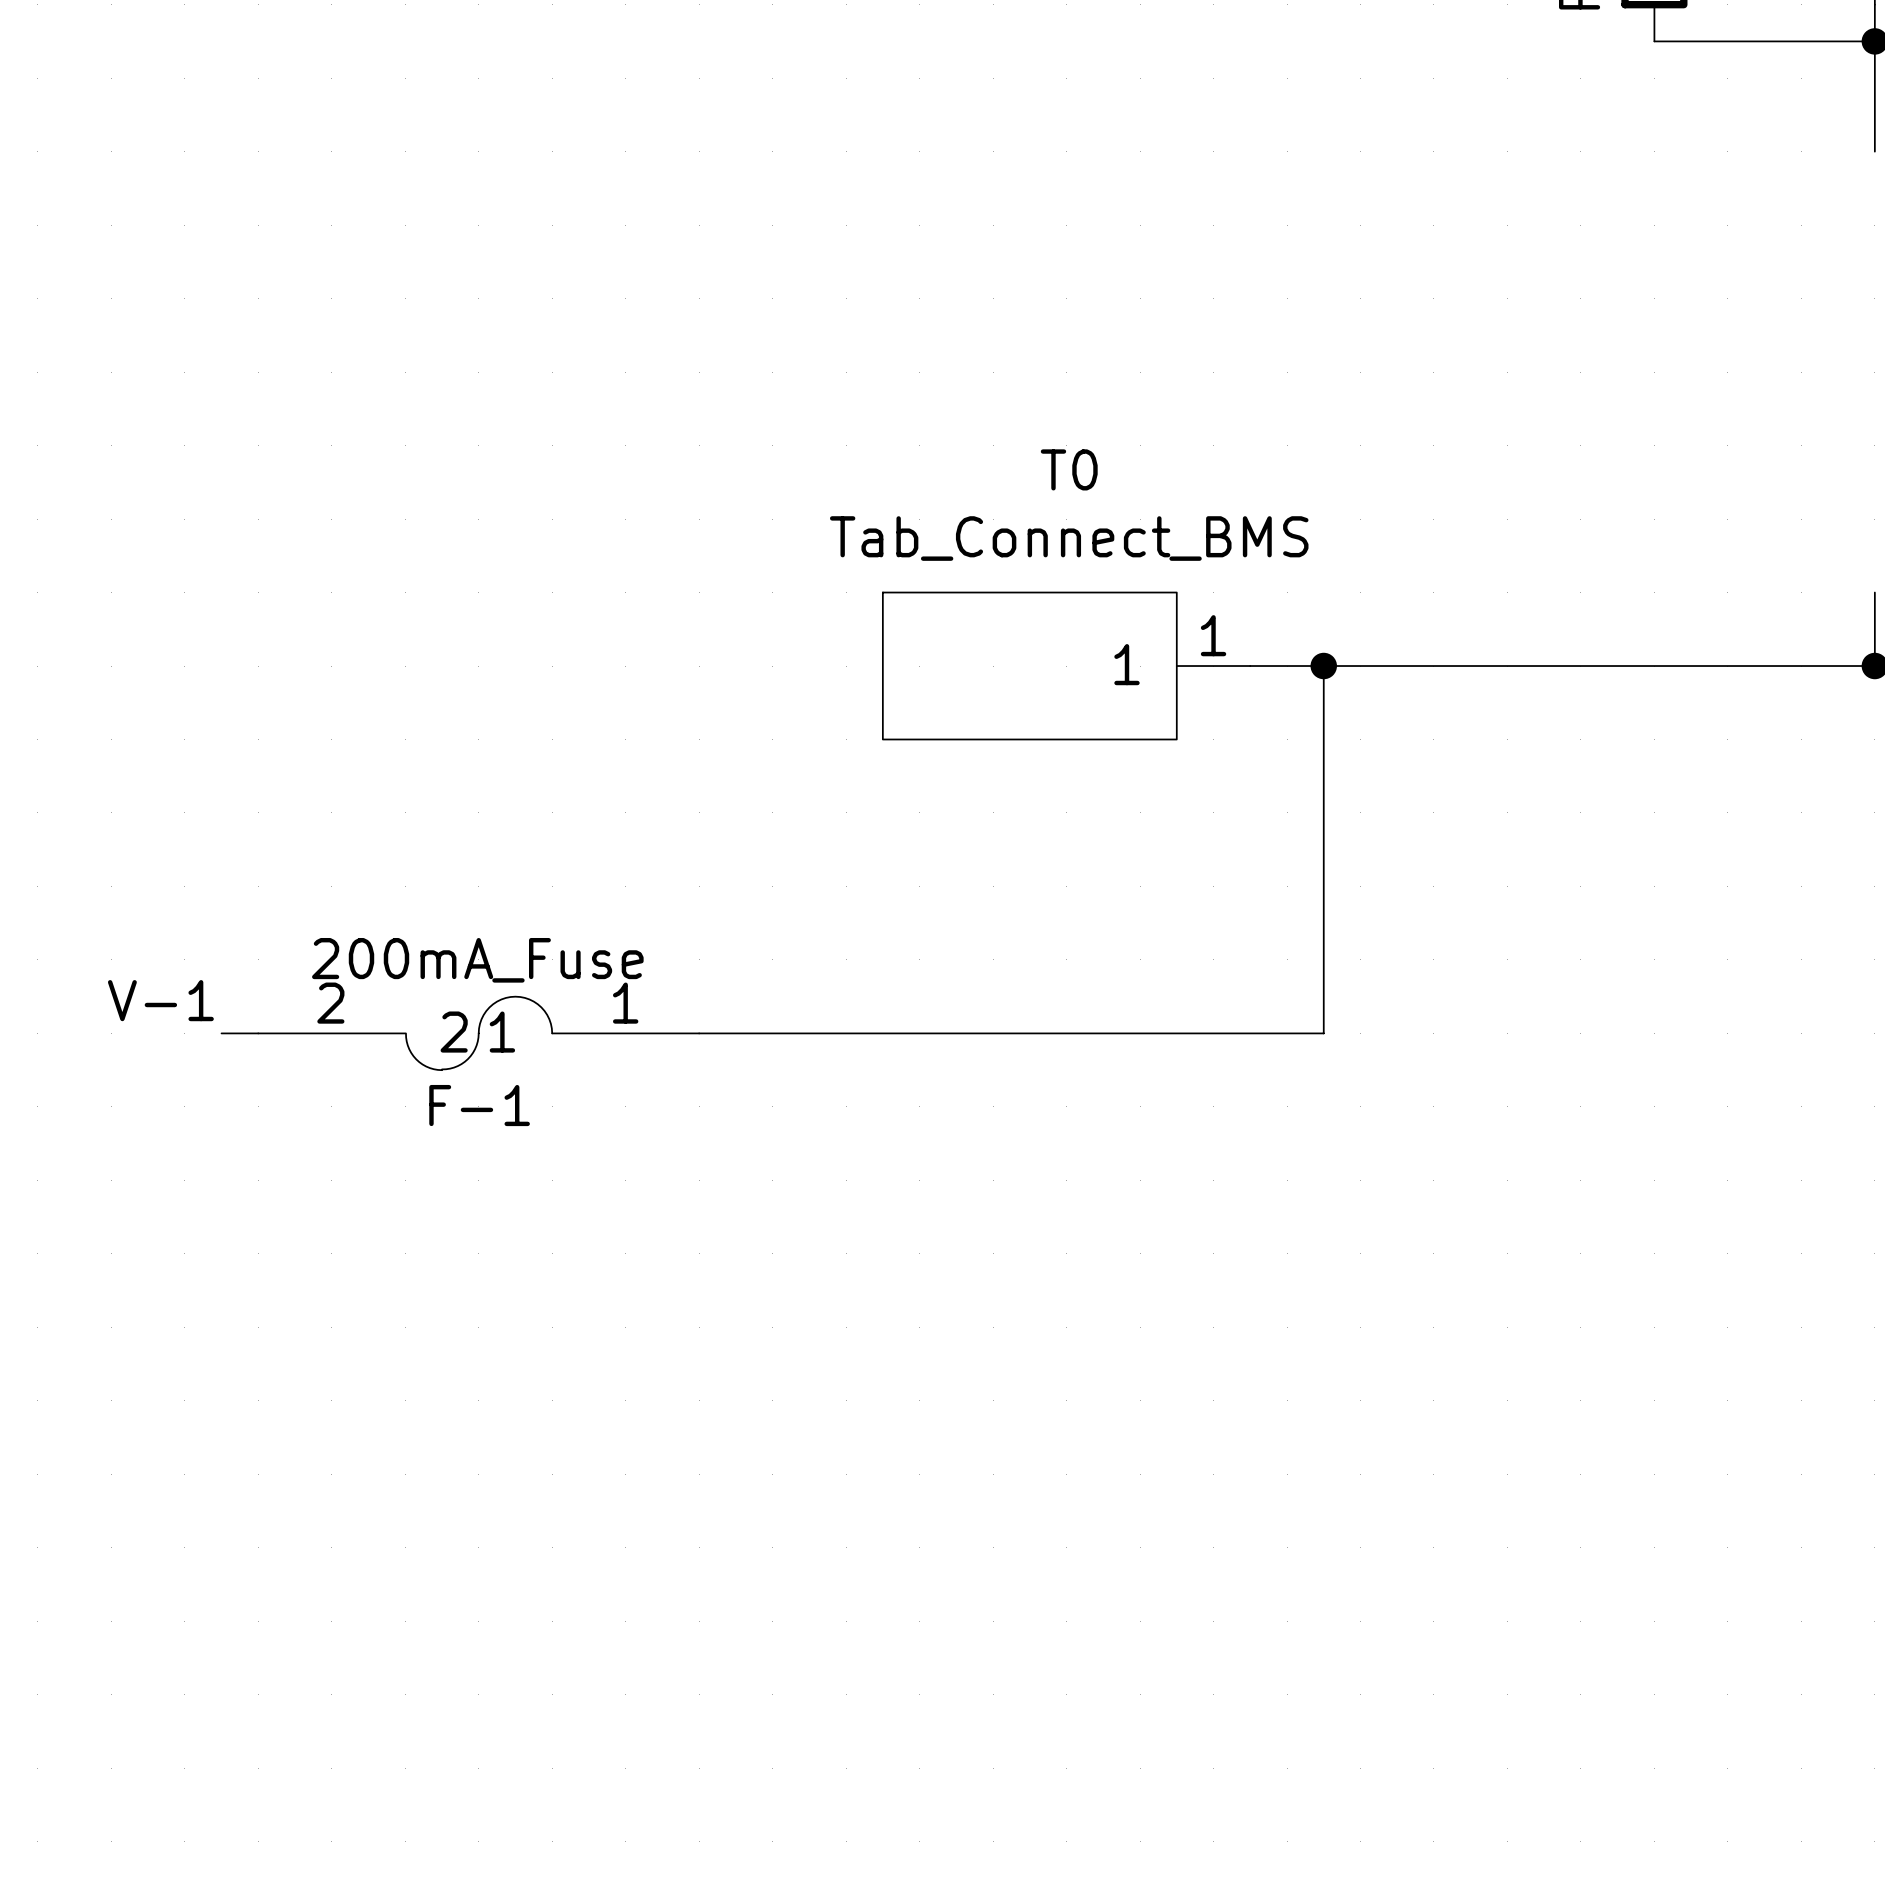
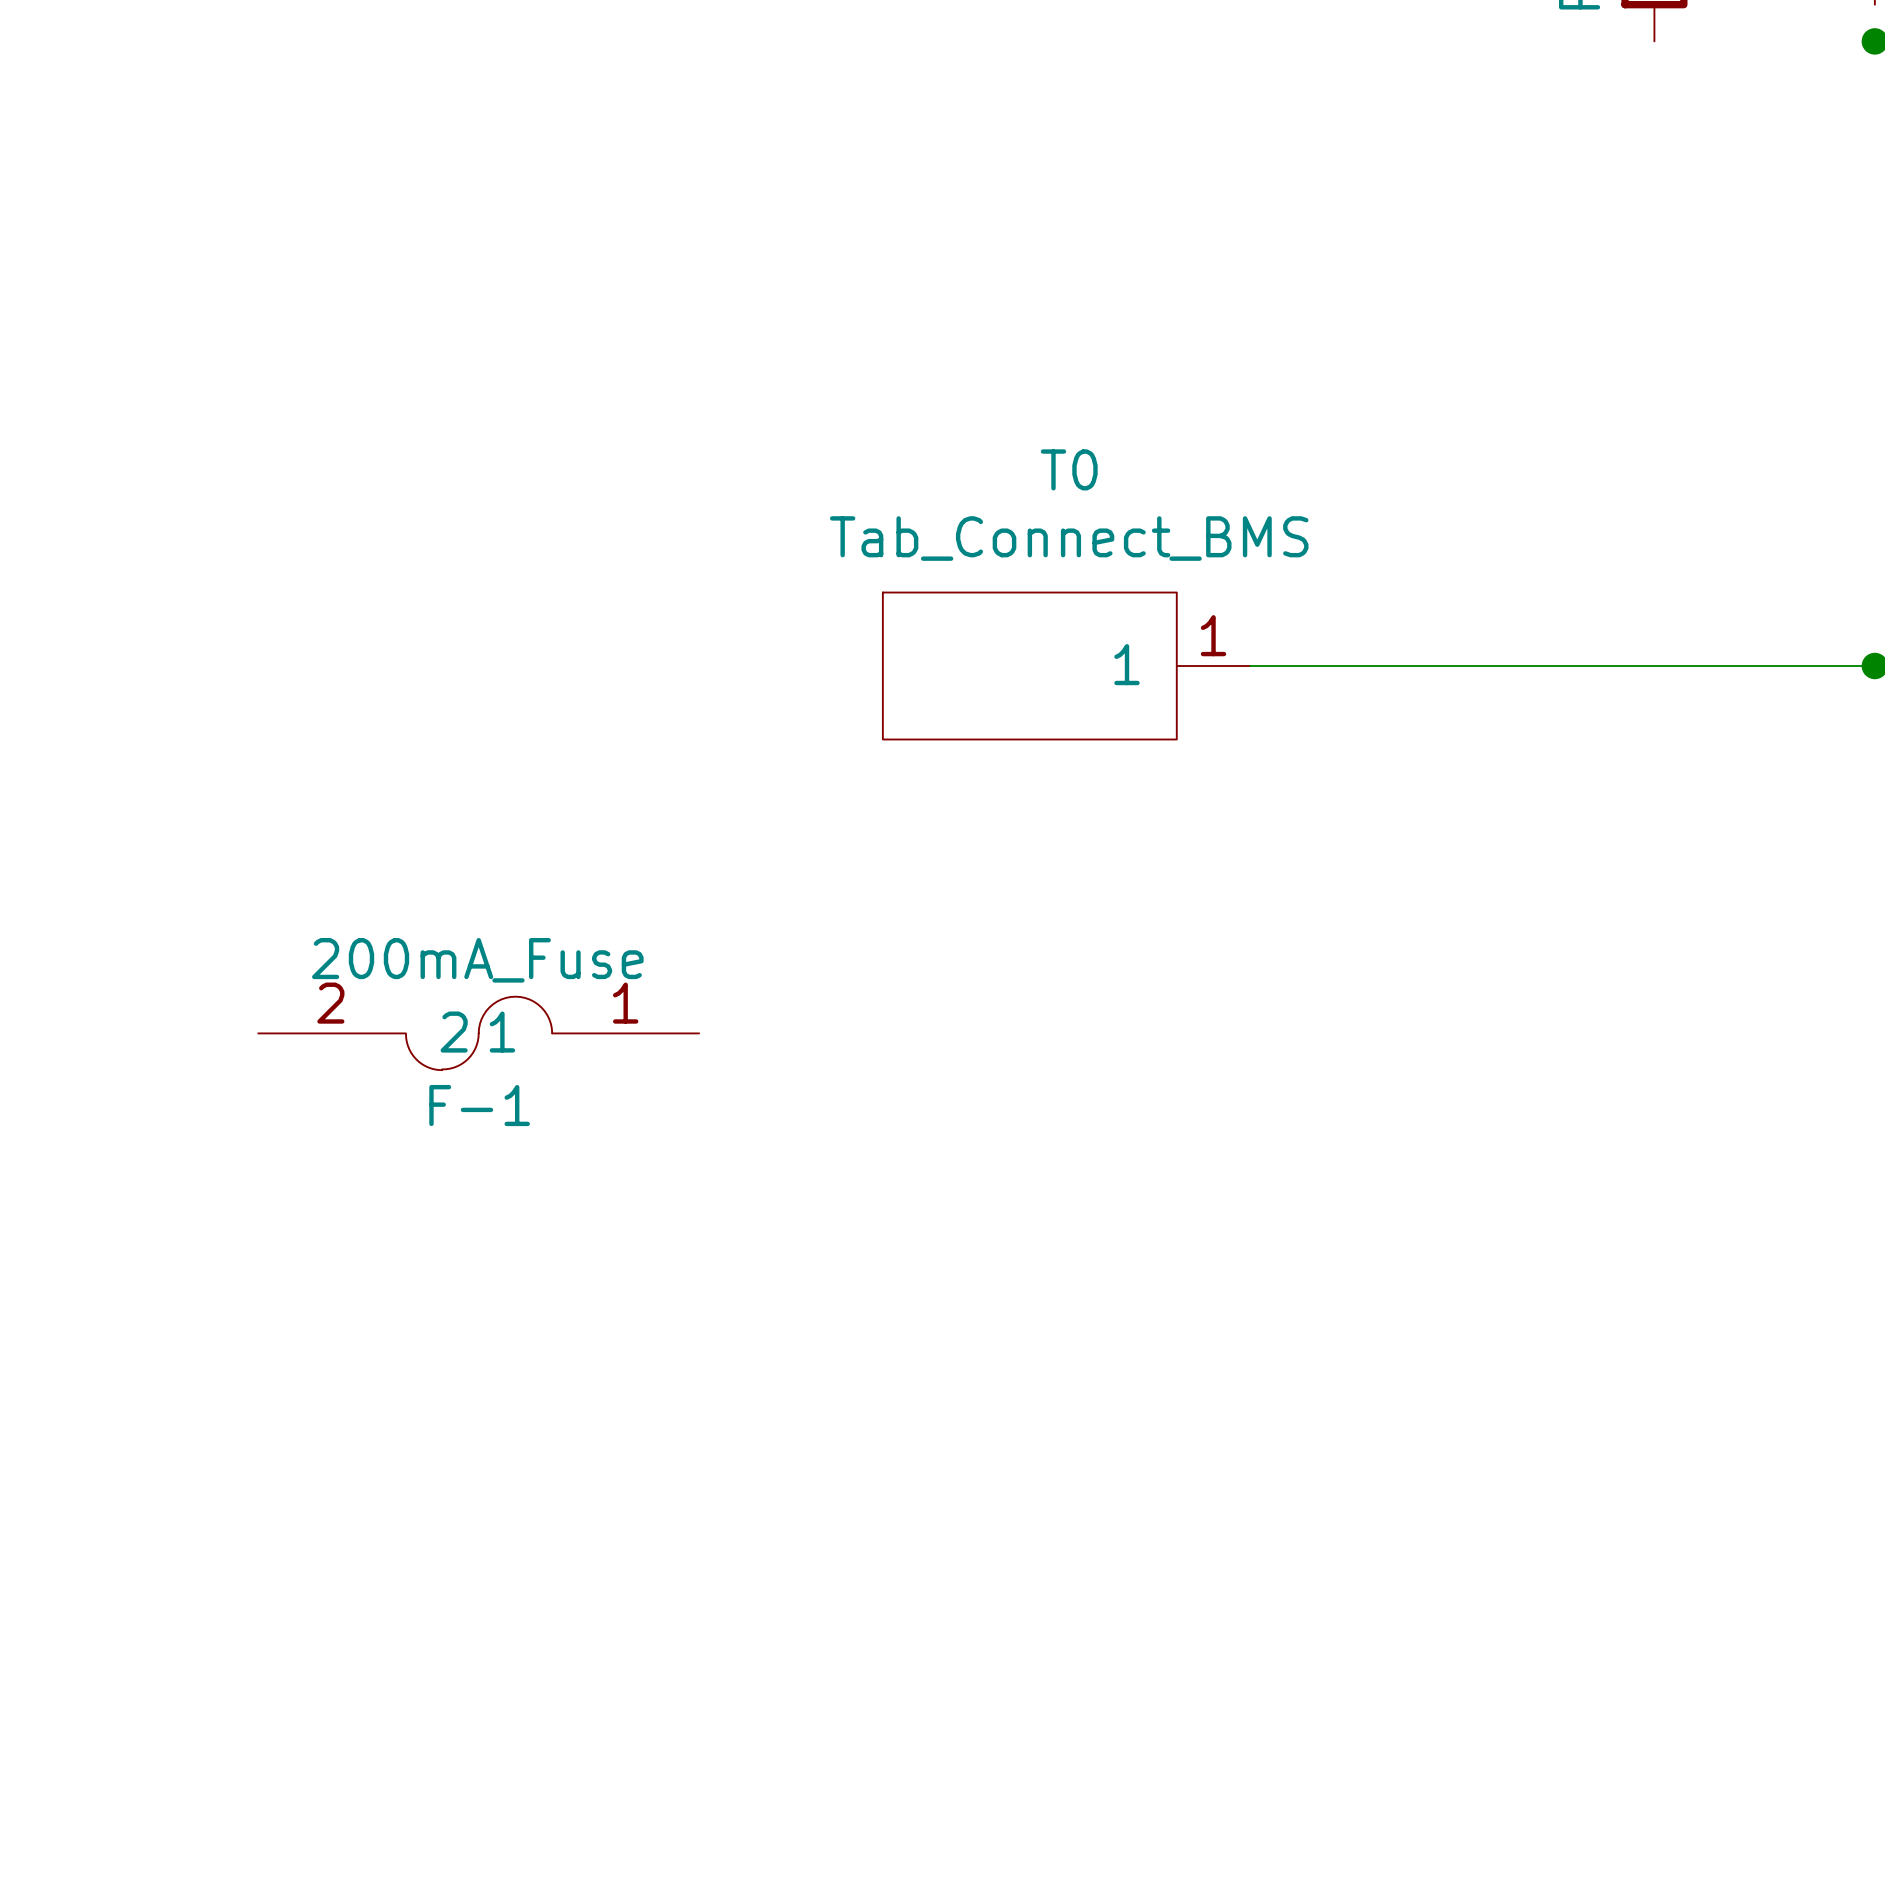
wire: (1874, 4) (1874, 151) -> none
wire: (1654, 41) (1874, 41) -> none
wire: (1874, 592) (1874, 666) -> none
wire: (1323, 666) (1323, 1033) (699, 1033) -> none
junction: (1323, 666) -> none
label: V-1 (160, 1000) -> none
wire: (221, 1033) (258, 1033) -> none

